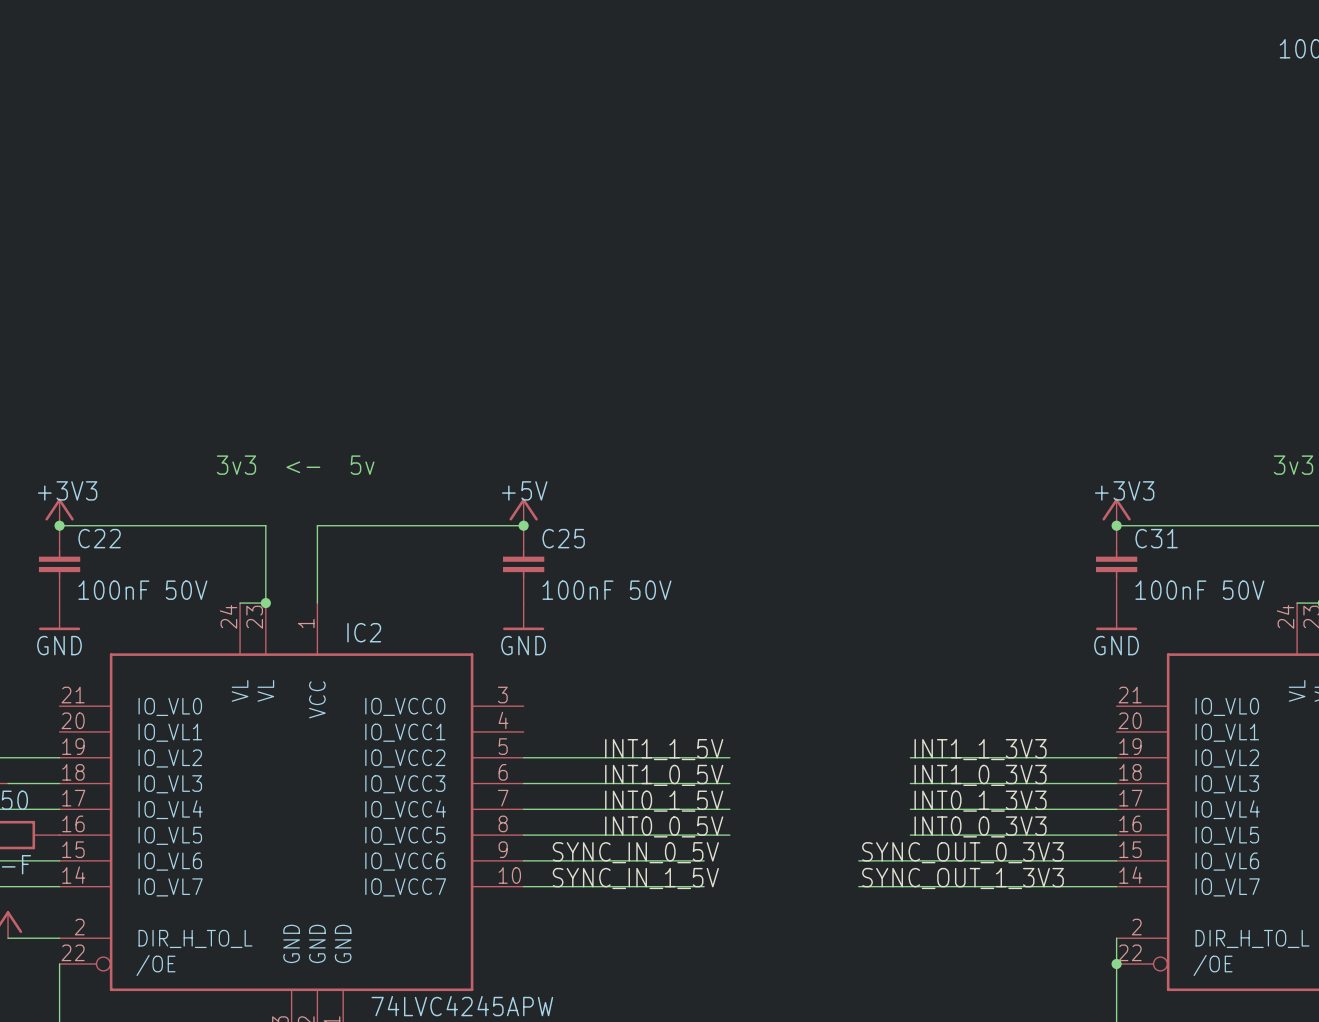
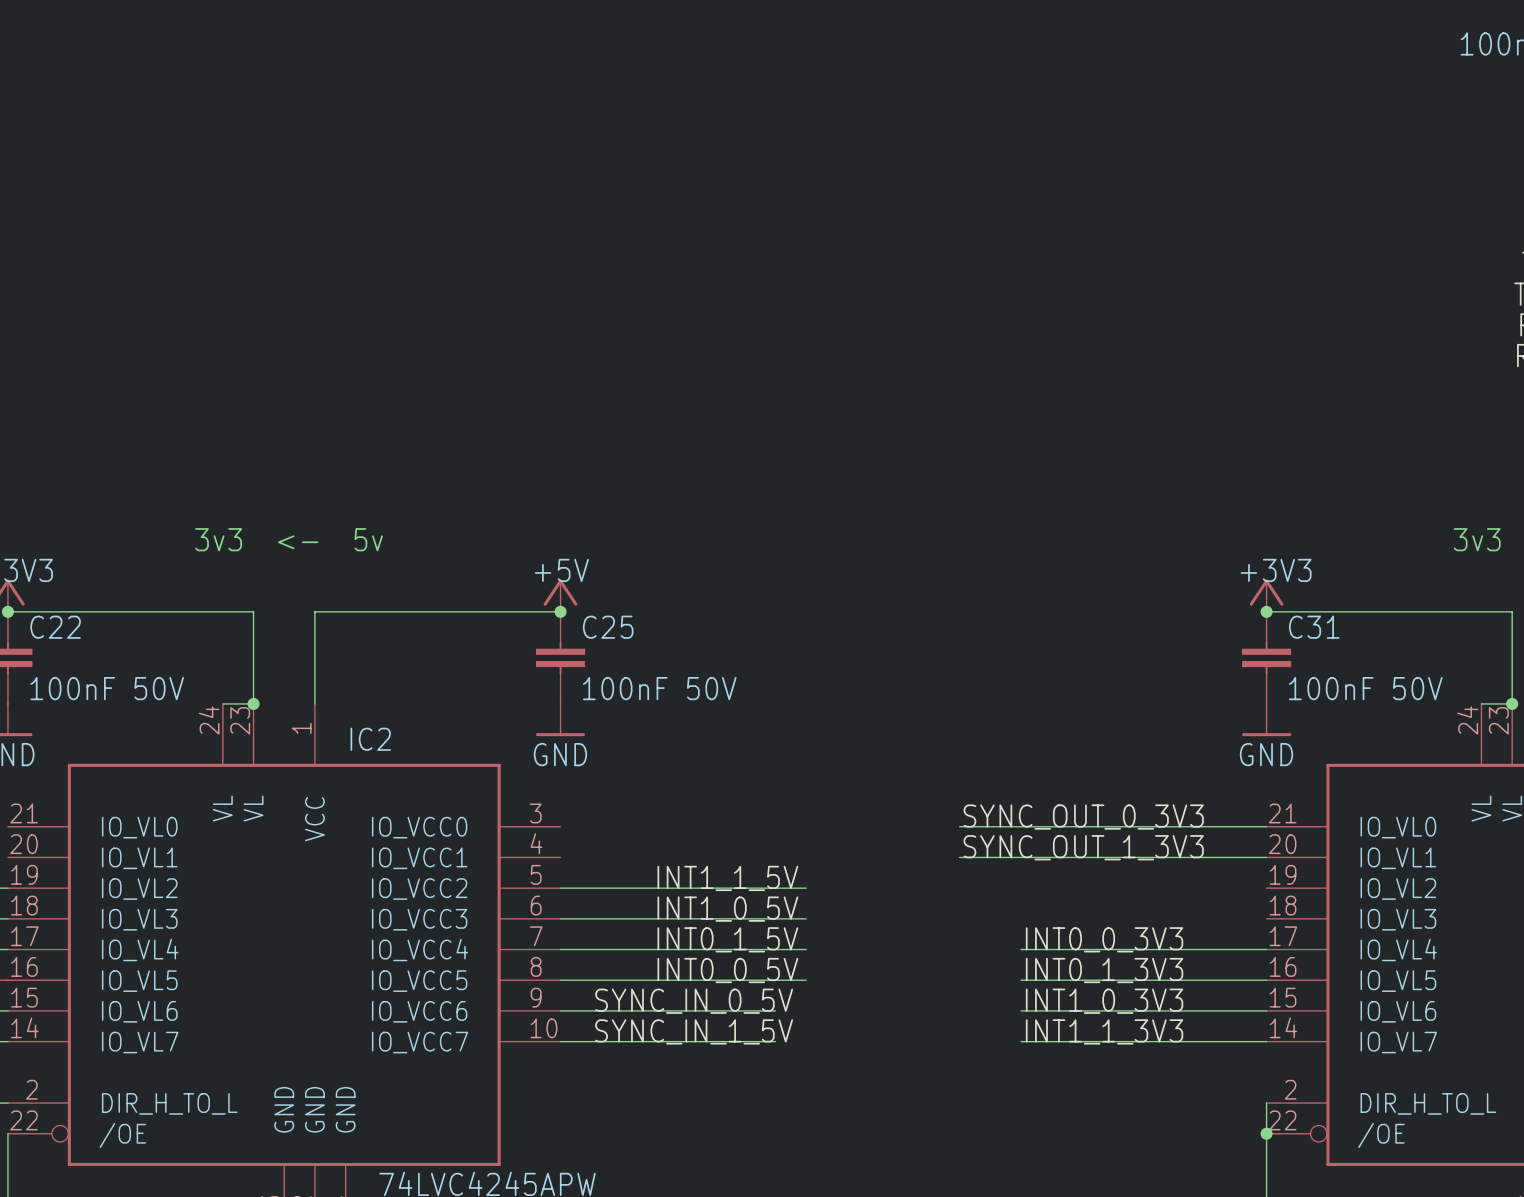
wire: none -> (959, 826) (1266, 826)
wire: none -> (959, 857) (1266, 857)
label position: INT1_1_3V3 (980, 749) -> INT1_1_3V3 (1104, 1031)
wire: (910, 757) (1116, 757) -> none
label position: INT1_0_3V3 (980, 775) -> INT1_0_3V3 (1104, 1001)
wire: (910, 783) (1116, 783) -> none
label: INT0_1_3V3 (980, 801) -> INT0_0_3V3 (1104, 939)
label: INT0_0_3V3 (980, 826) -> INT0_1_3V3 (1104, 970)
label position: SYNC_OUT_0_3V3 (963, 852) -> SYNC_OUT_0_3V3 (1083, 817)
wire: (858, 860) (910, 860) -> none
label position: SYNC_OUT_1_3V3 (963, 878) -> SYNC_OUT_1_3V3 (1083, 847)
wire: (858, 886) (910, 886) -> none

